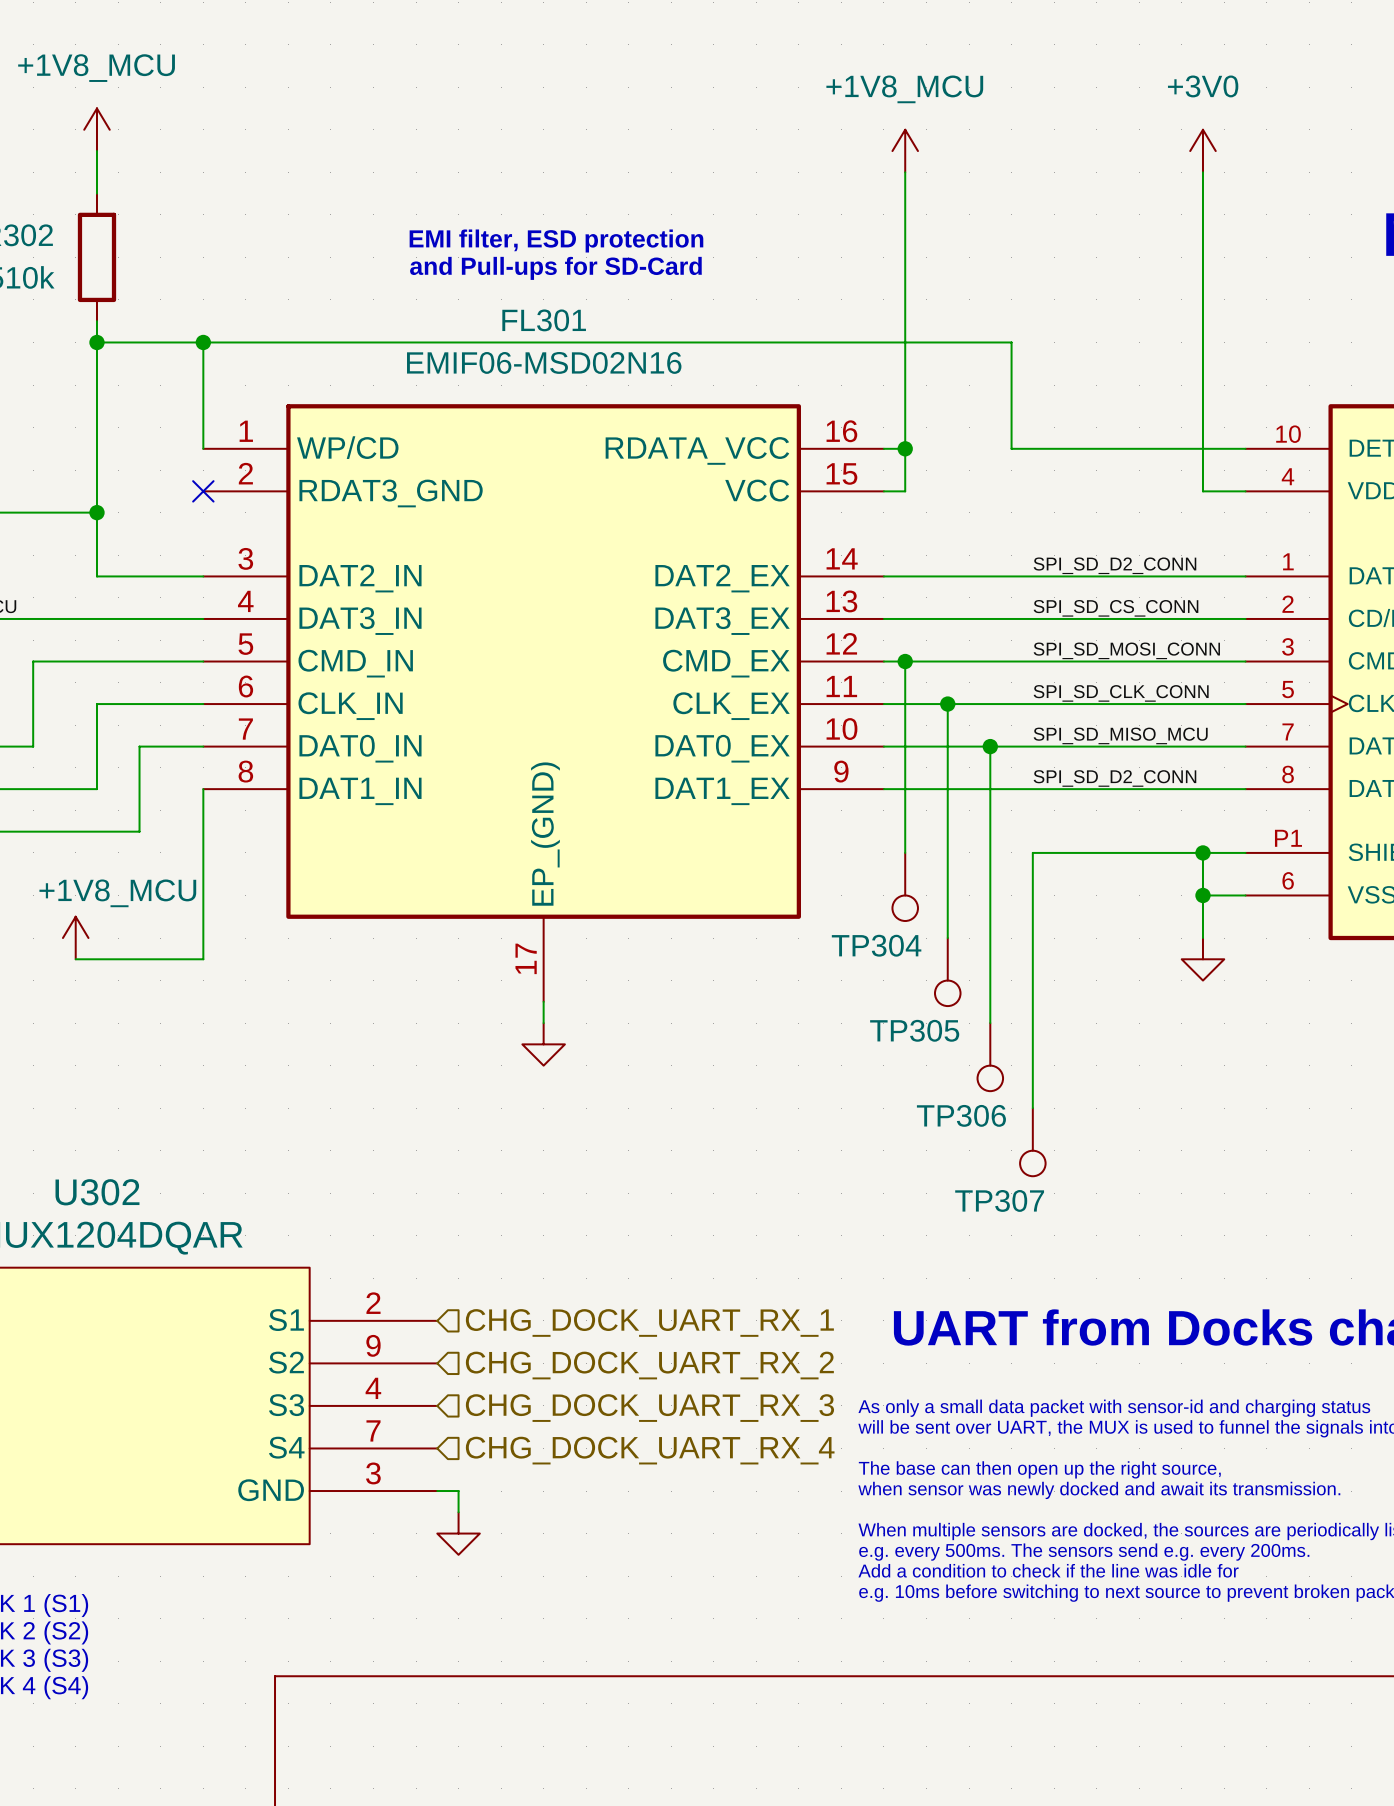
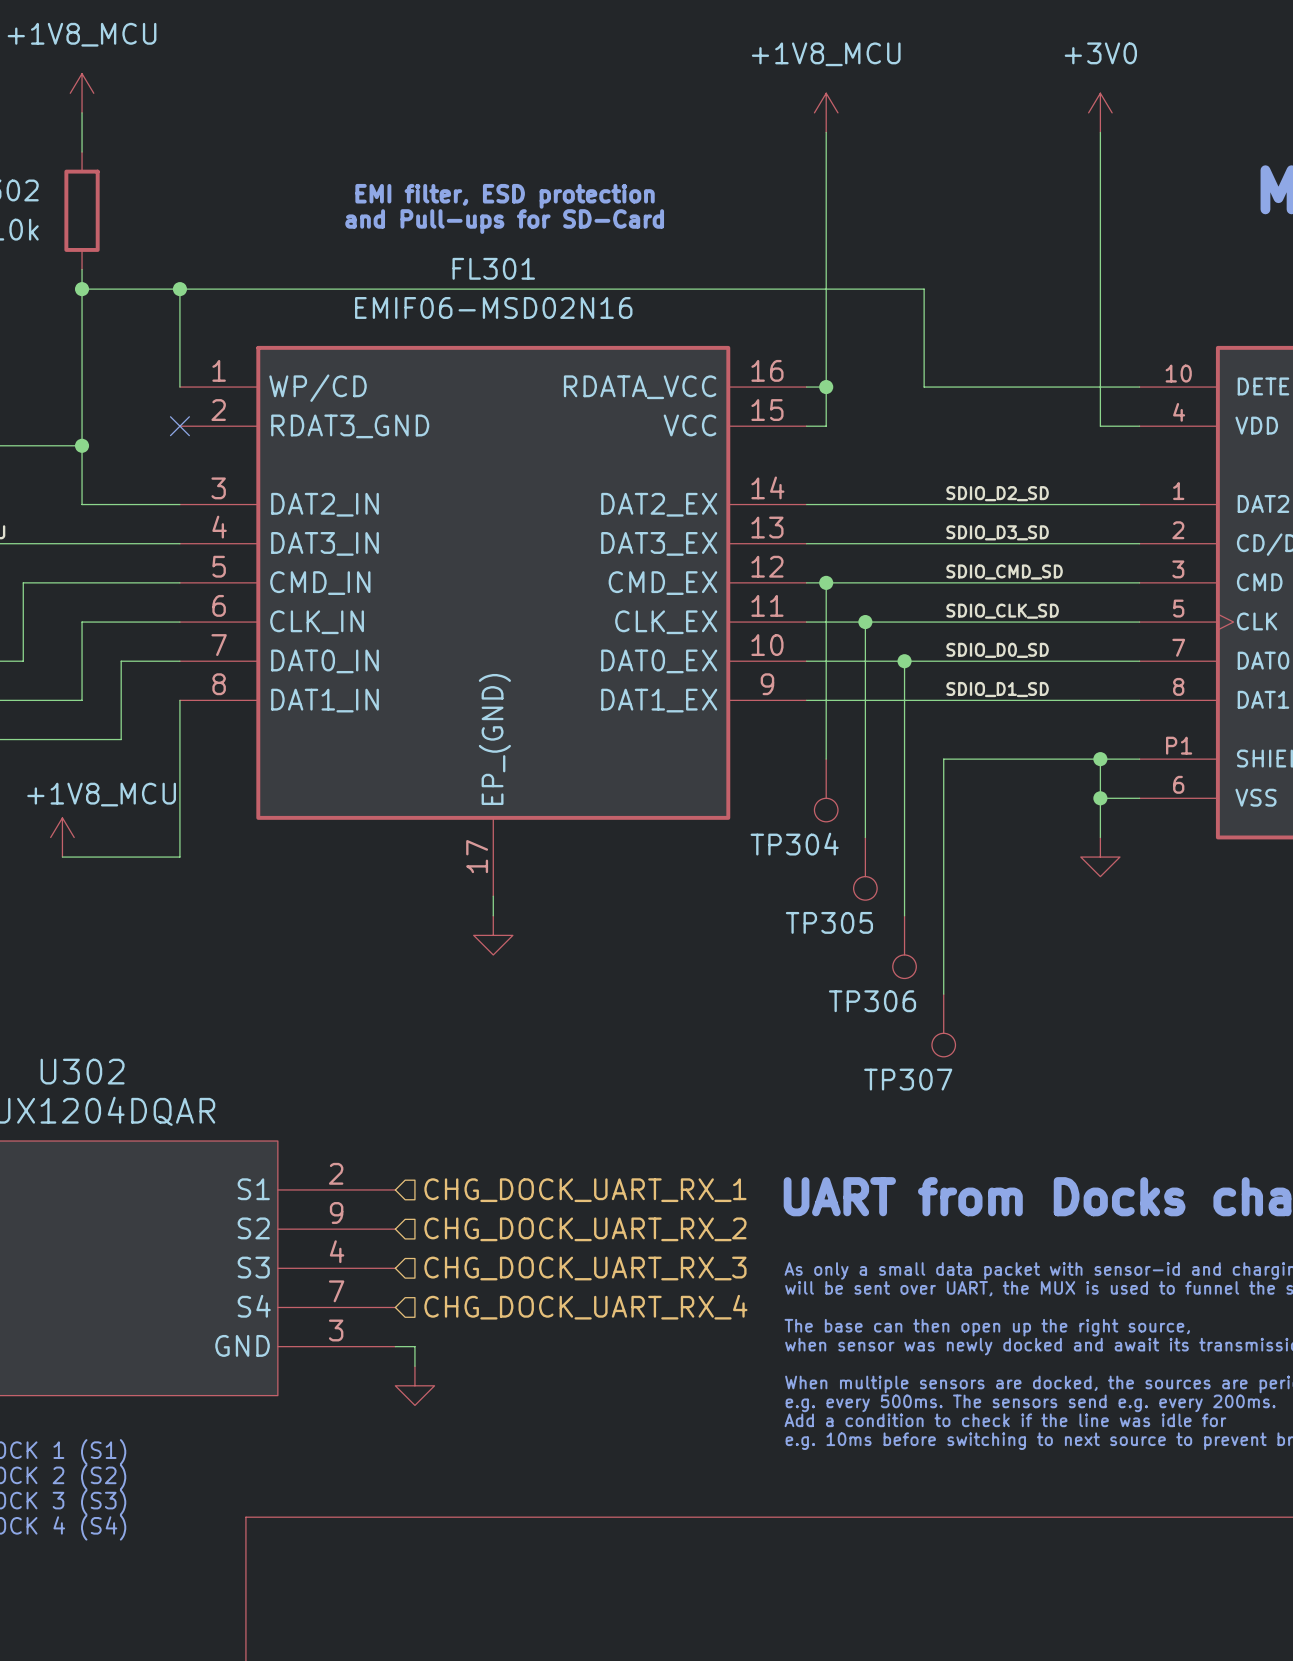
label: SPI_SD_D2_CONN (1114, 565) -> SDIO_D2_SD (997, 493)
label: SPI_SD_CS_CONN (1116, 608) -> SDIO_D3_SD (997, 532)
label: SPI_SD_MOSI_CONN (1126, 650) -> SDIO_CMD_SD (1004, 572)
label: SPI_SD_CLK_CONN (1121, 693) -> SDIO_CLK_SD (1002, 611)
label: SPI_SD_MISO_MCU (1120, 735) -> SDIO_D0_SD (997, 650)
label: SPI_SD_D2_CONN (1114, 778) -> SDIO_D1_SD (997, 689)

